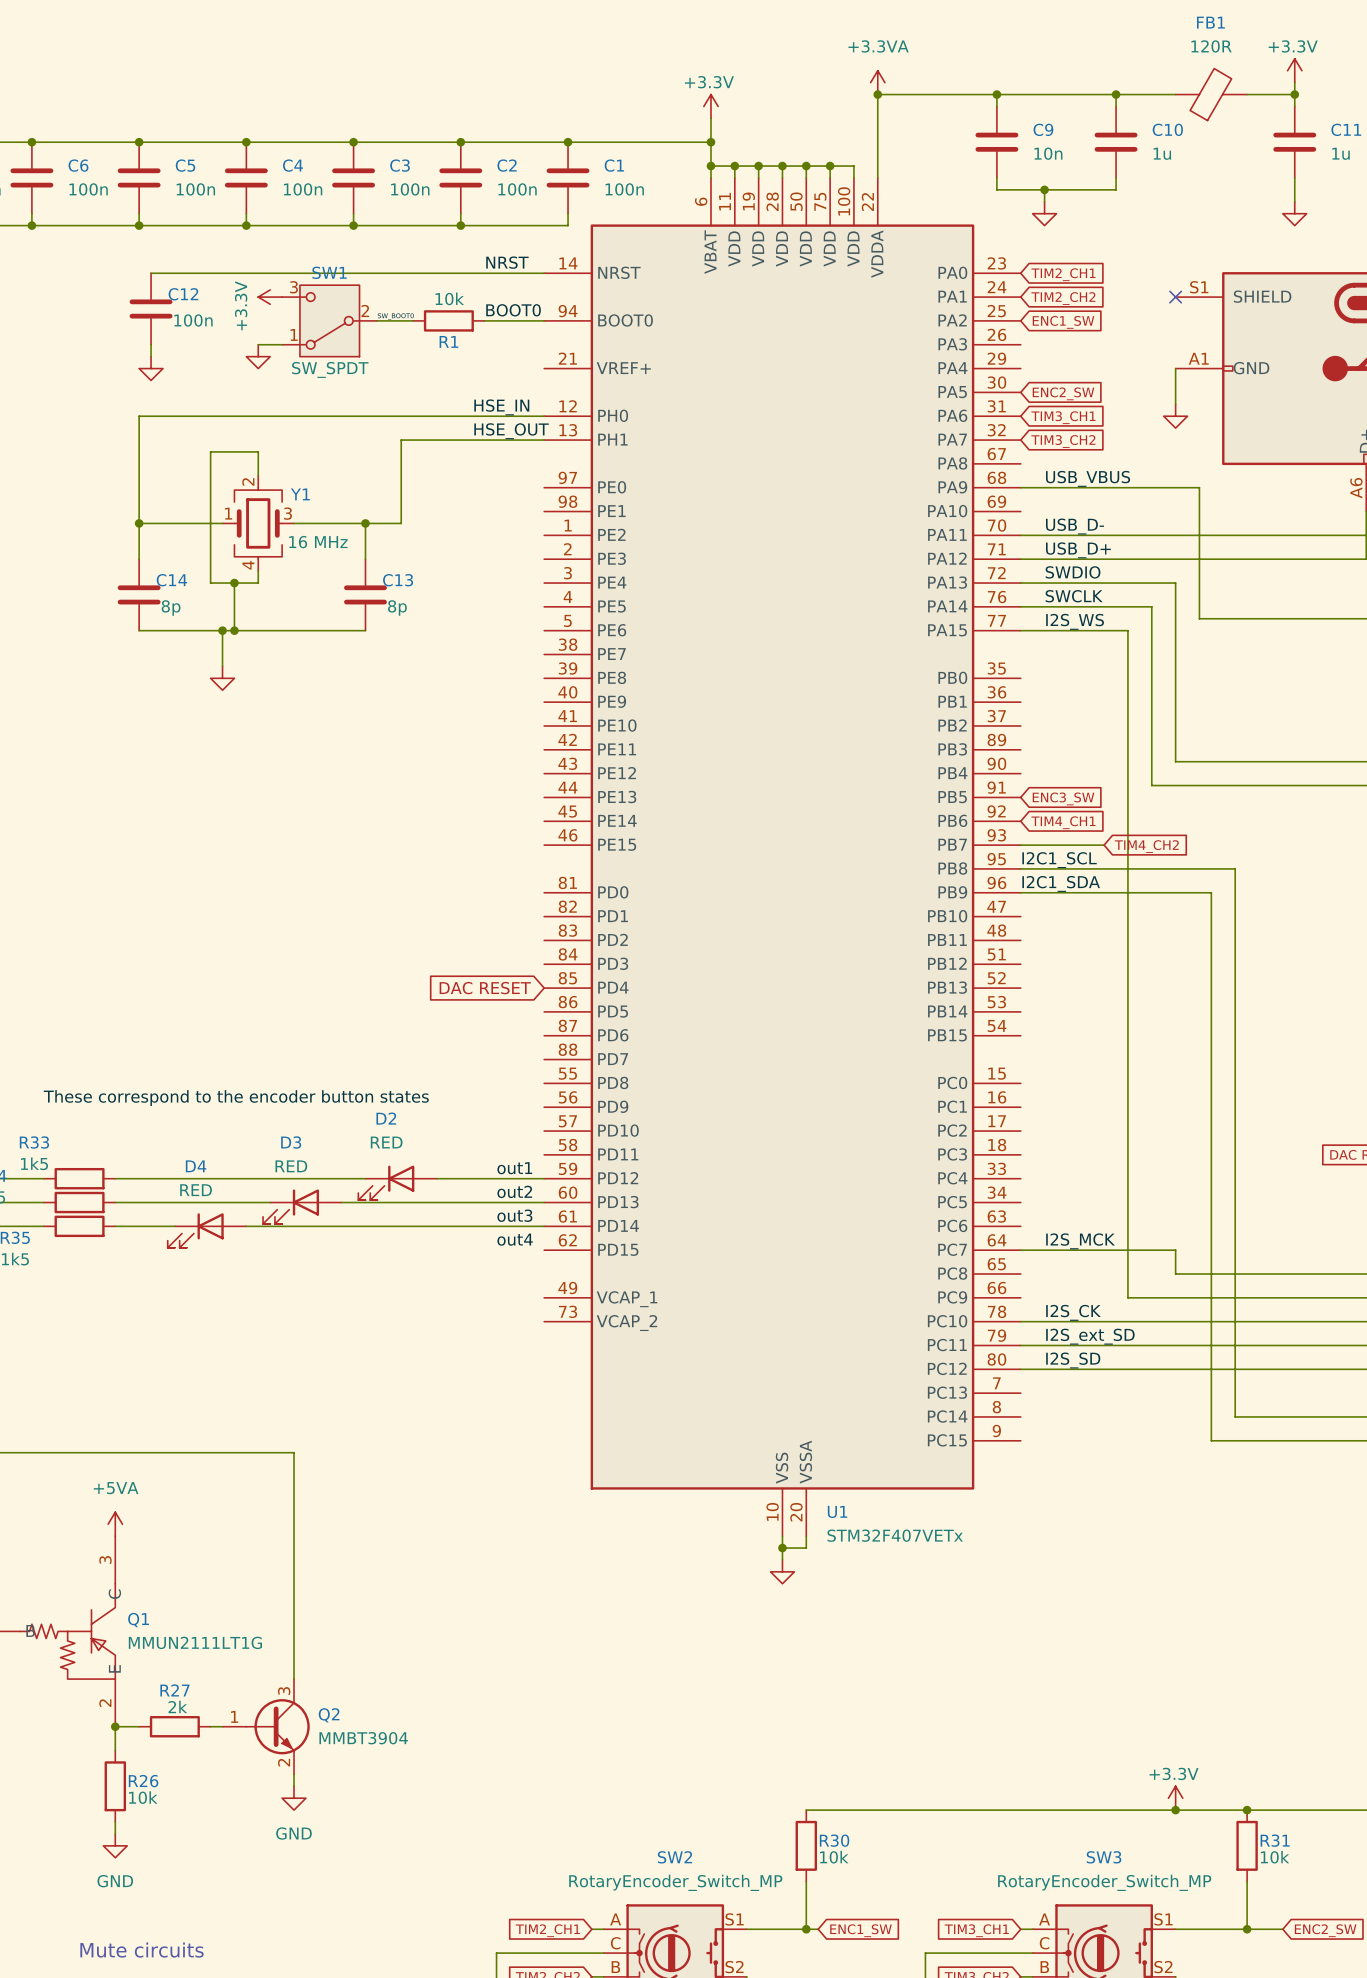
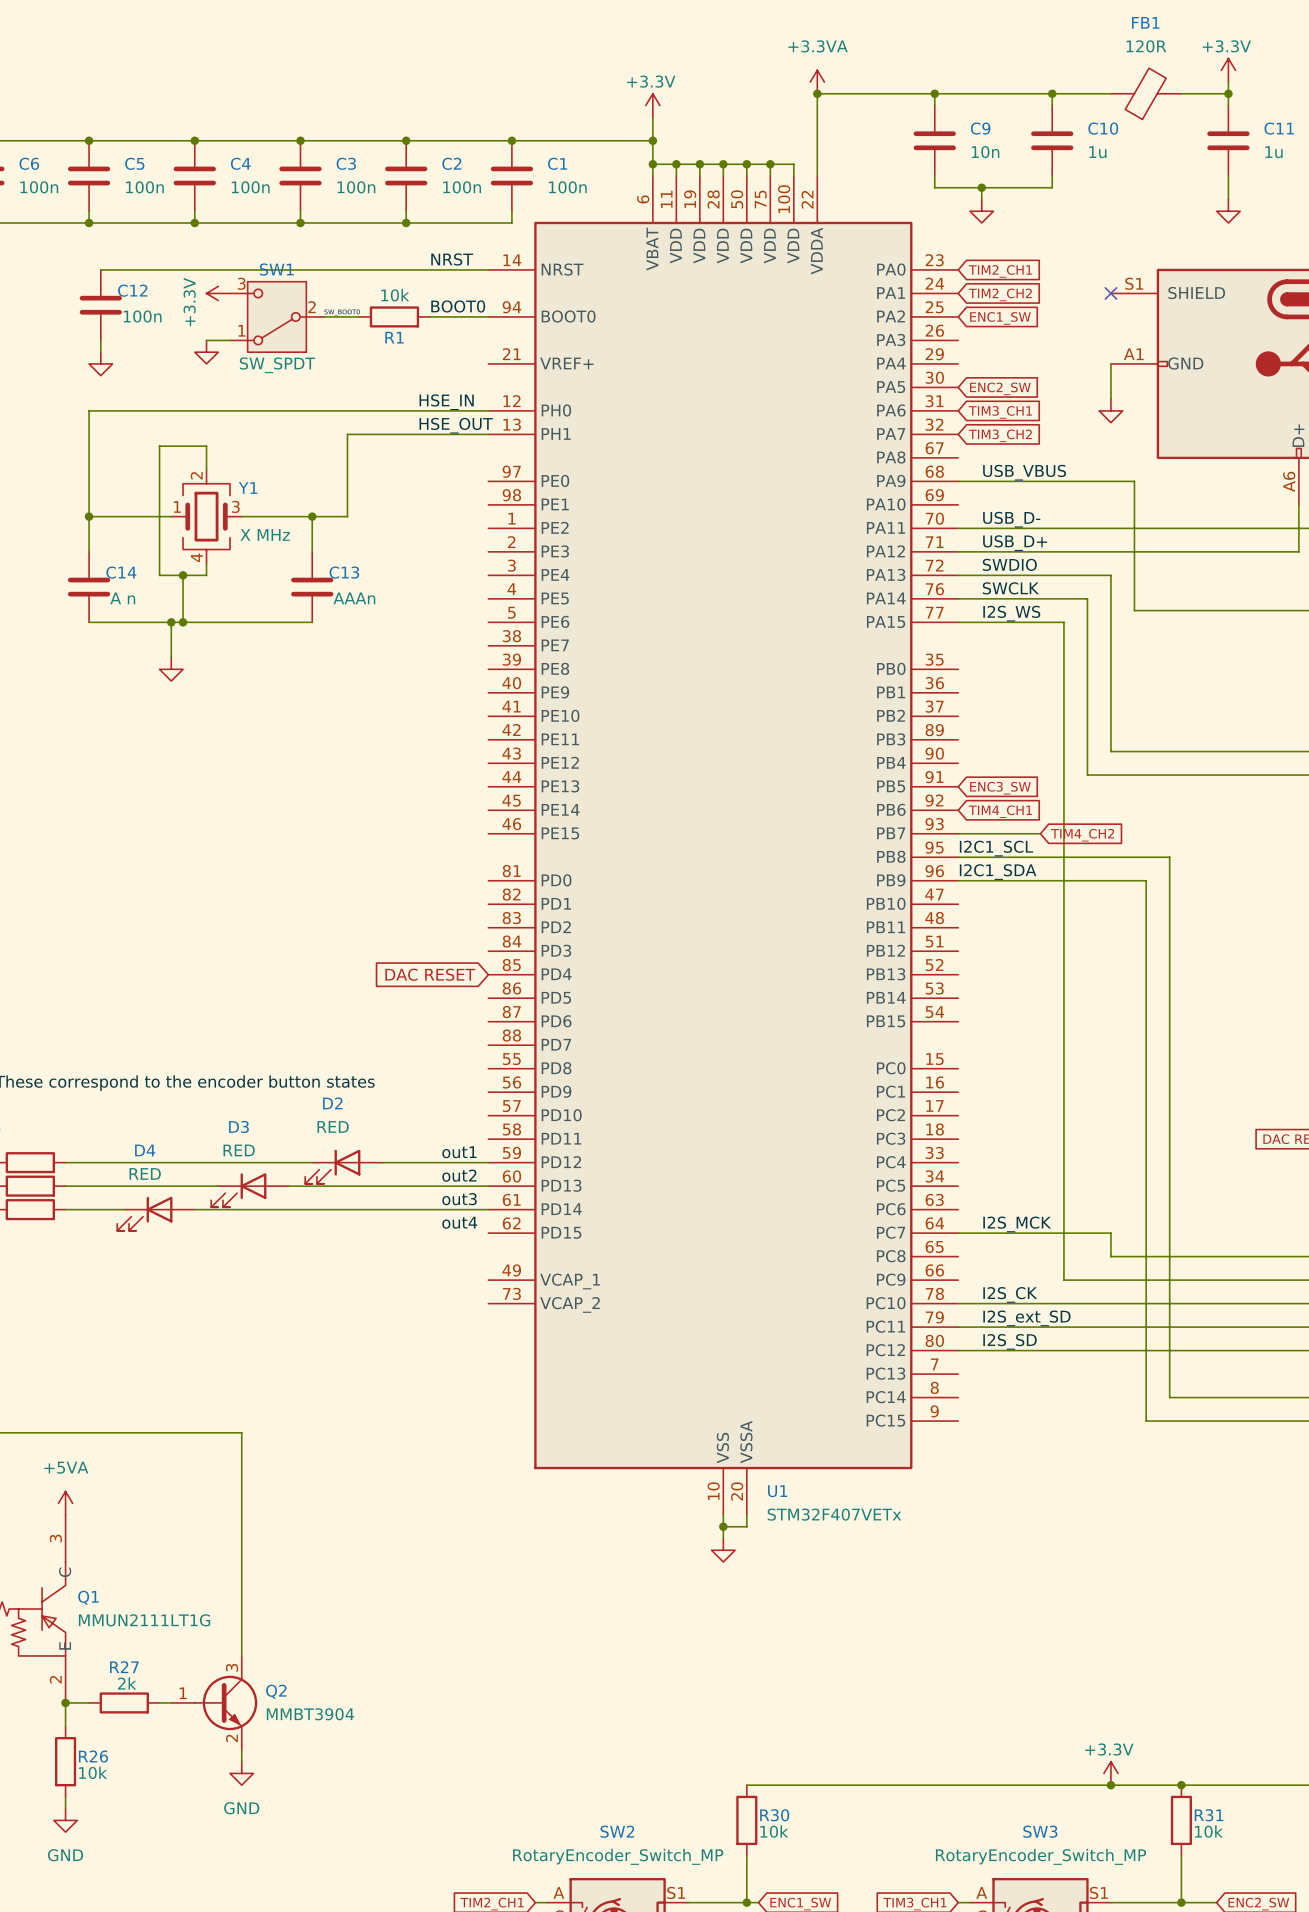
Y1 value: 16 MHz (318, 542) -> X MHz (265, 534)
C14 value: 8p (171, 607) -> A n (122, 598)
C13 value: 8p (397, 607) -> AAAn (354, 598)

